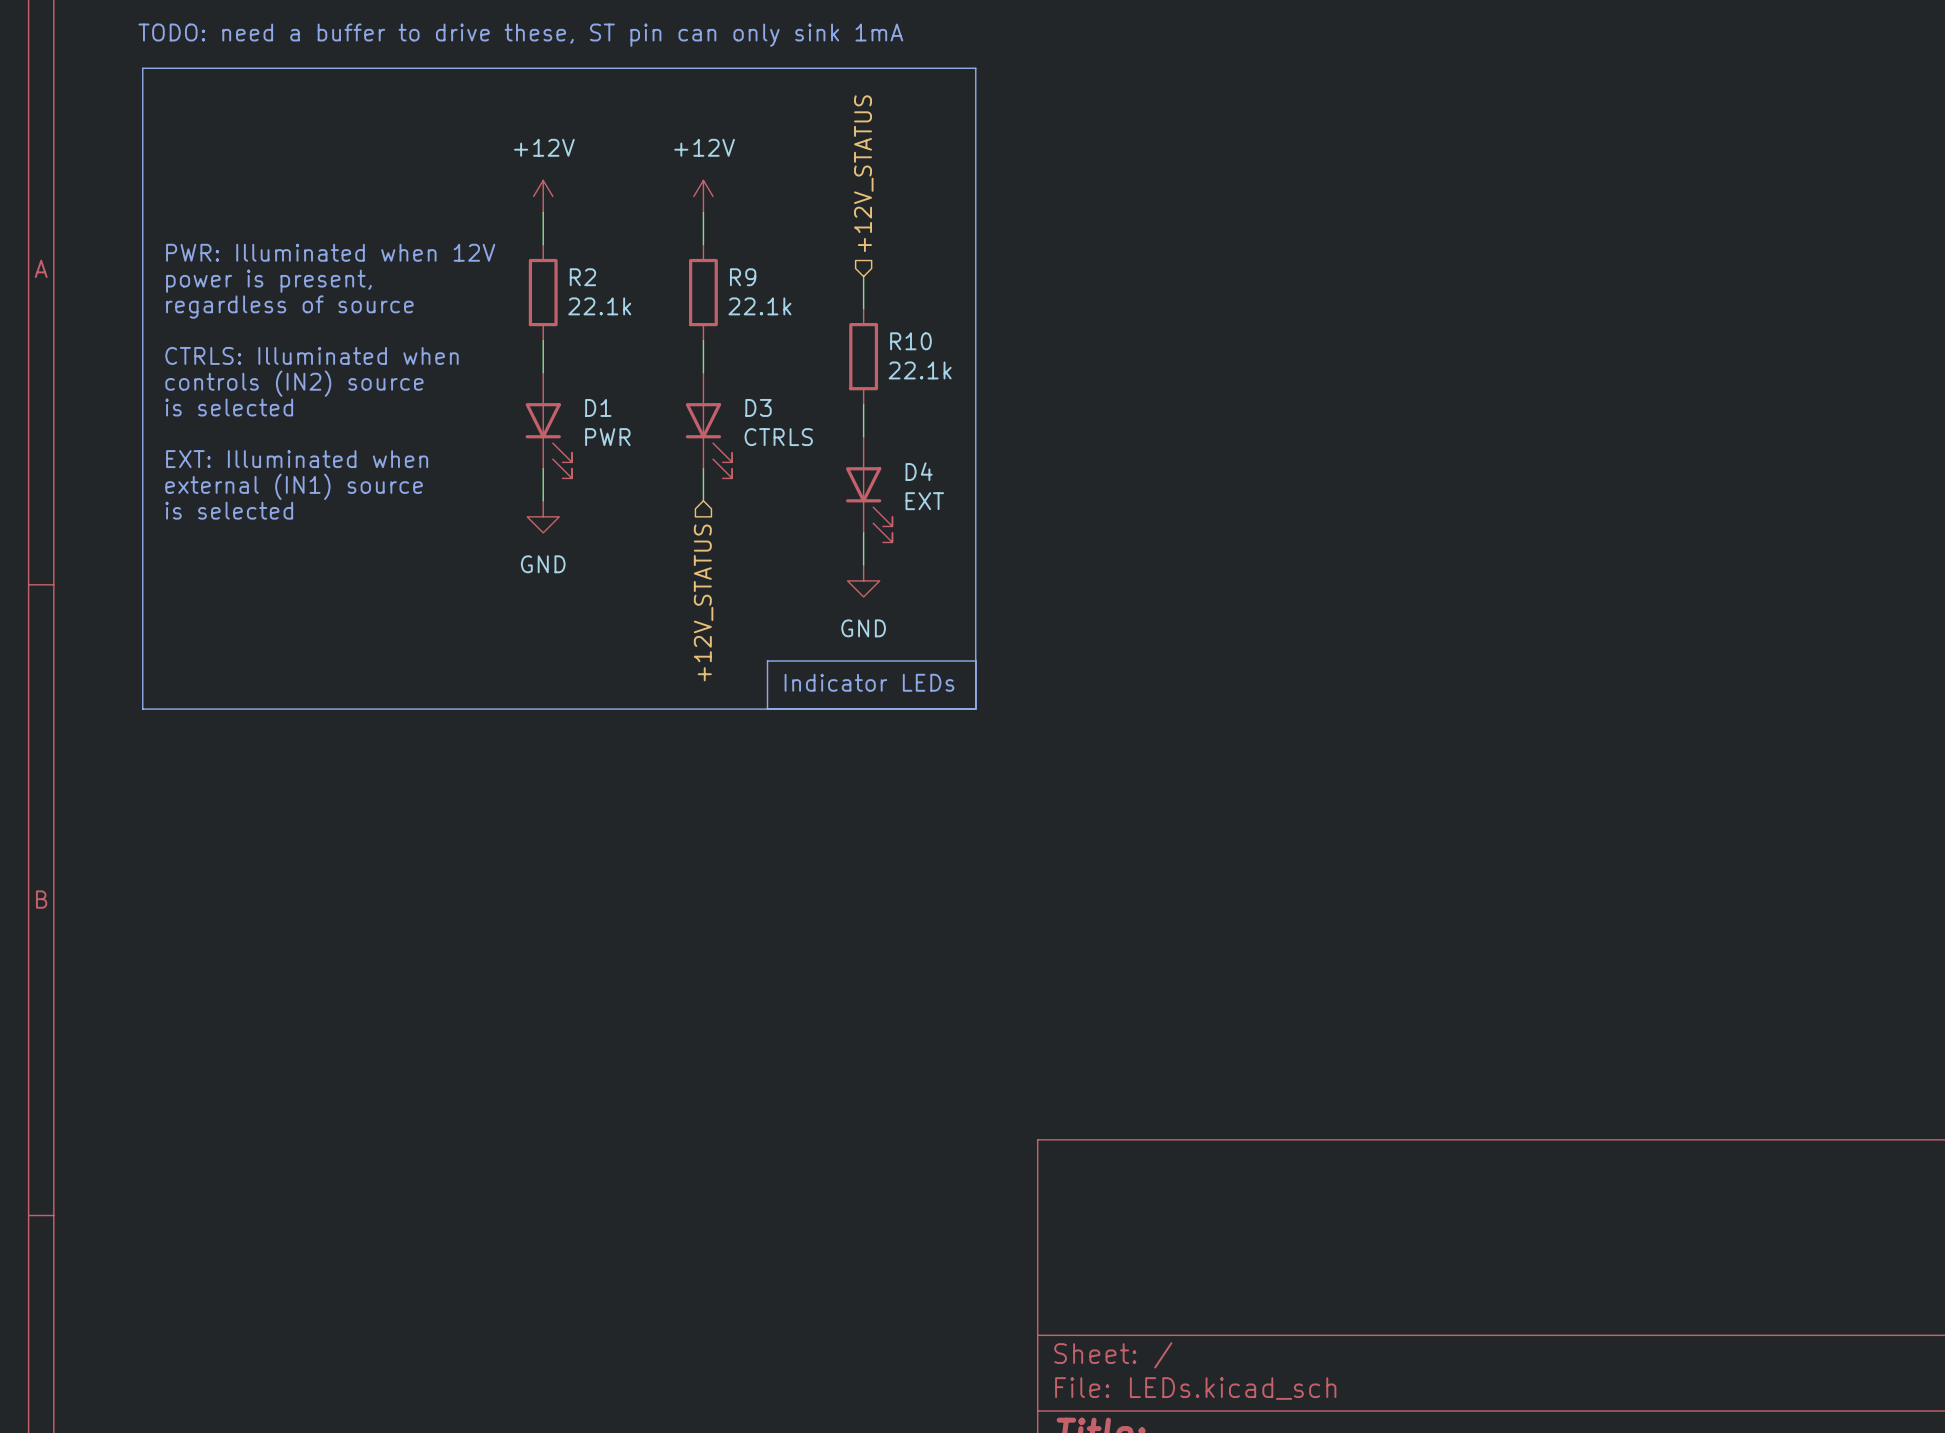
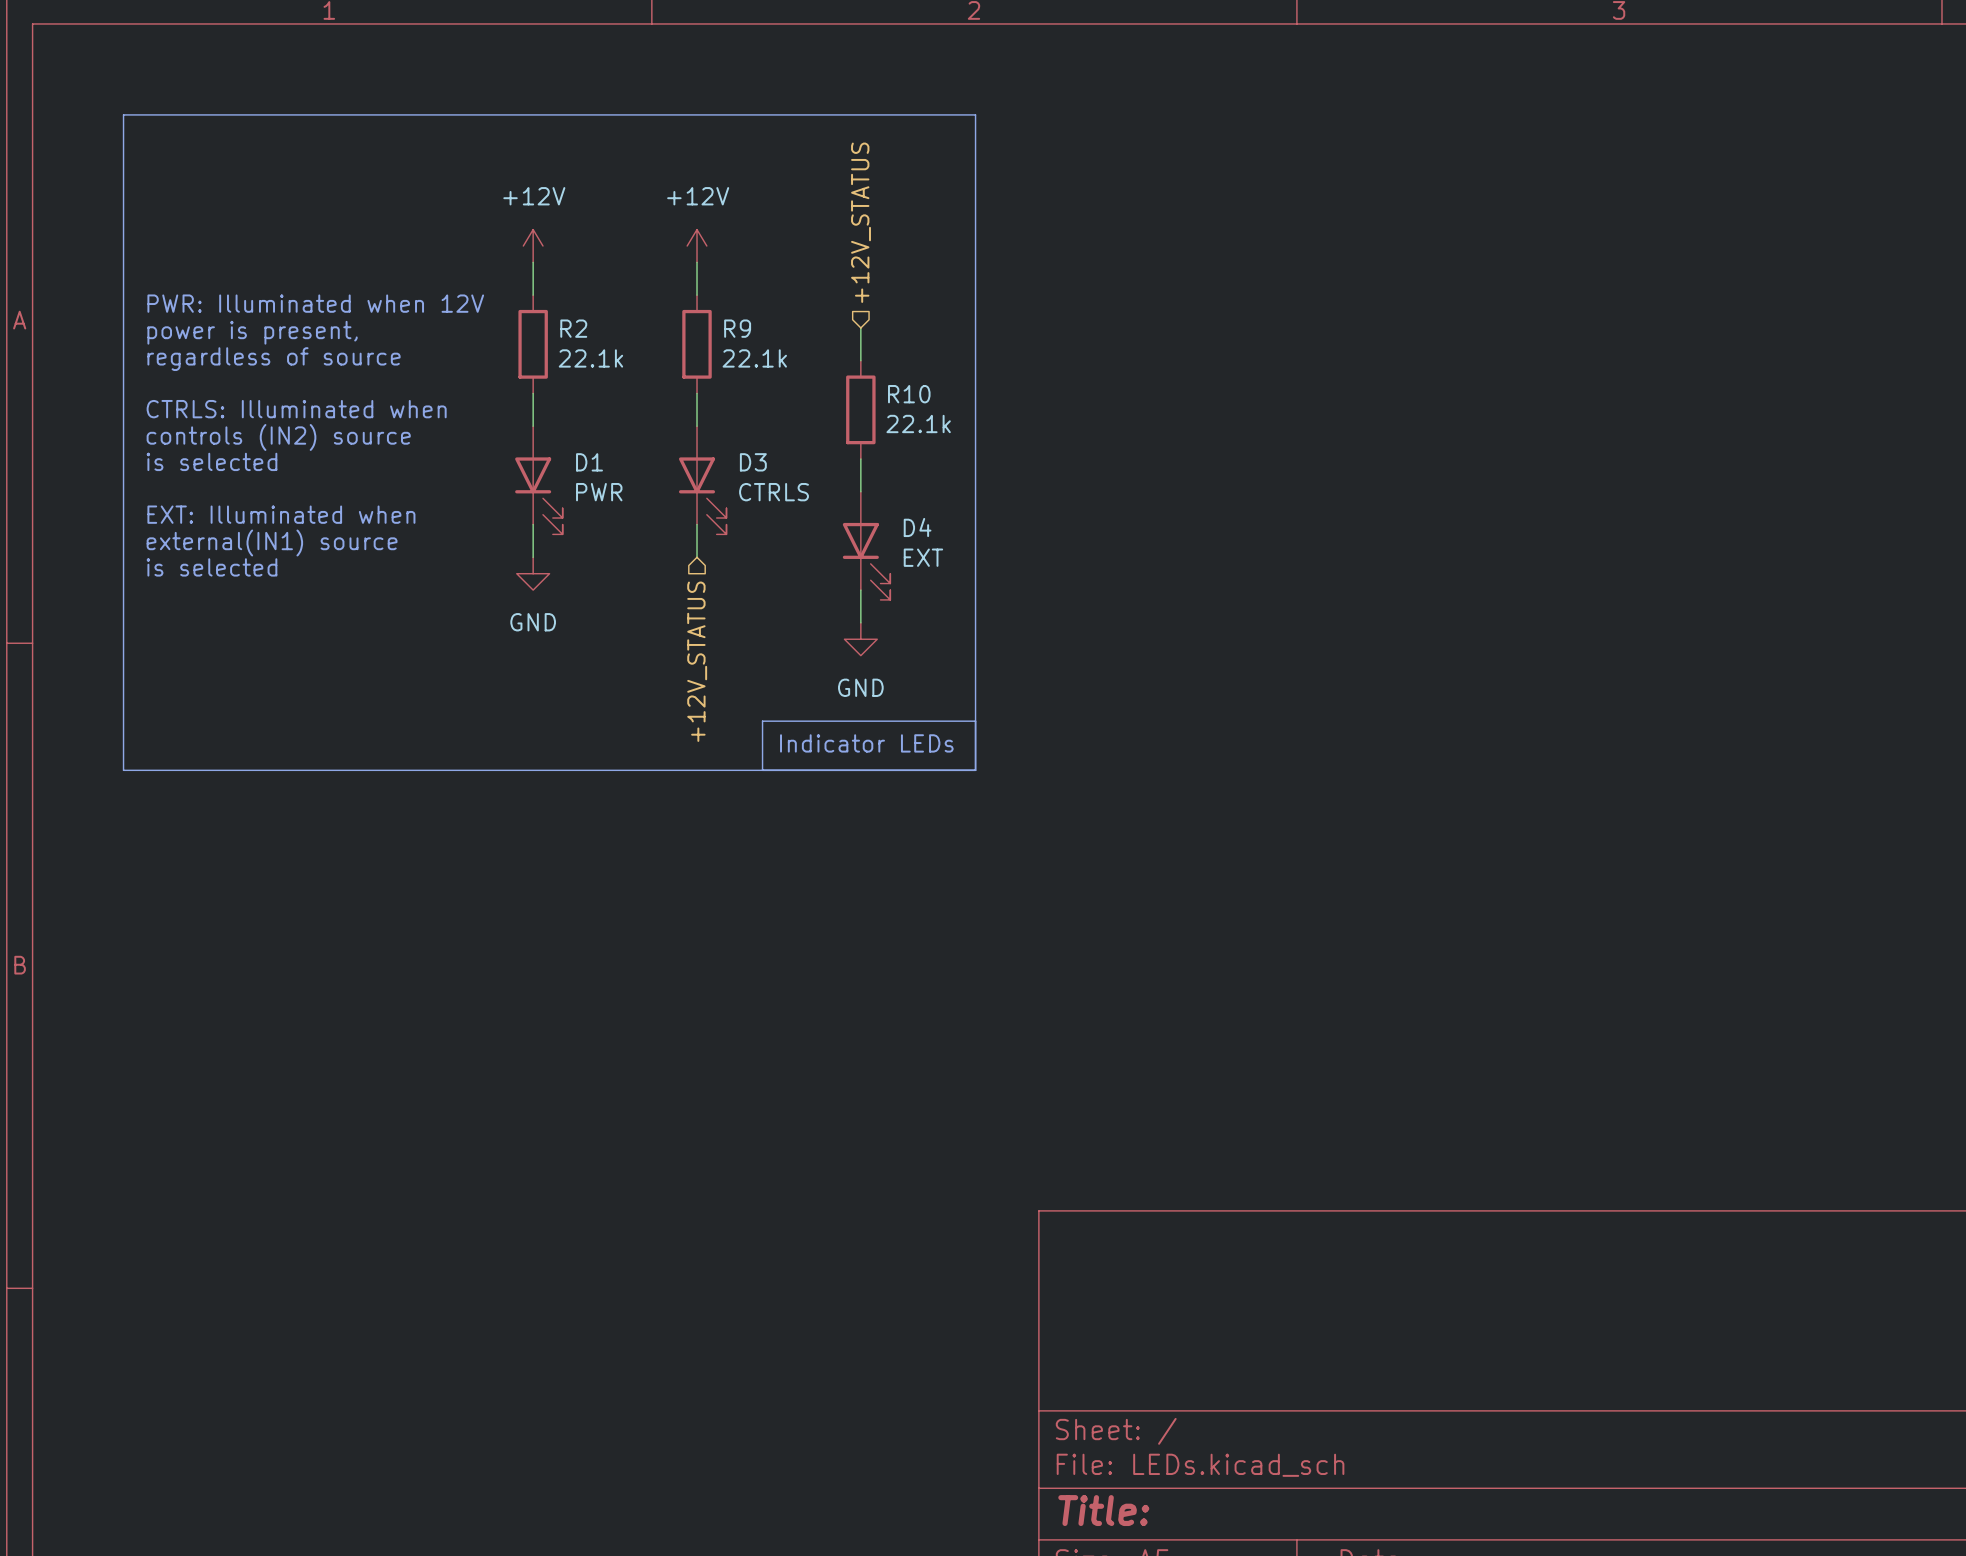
text: TODO: need a buffer to drive these, ST pin can only sink 1mA (520, 35) -> none
text: external (IN1) source (294, 486) -> external(IN1) source (272, 542)

